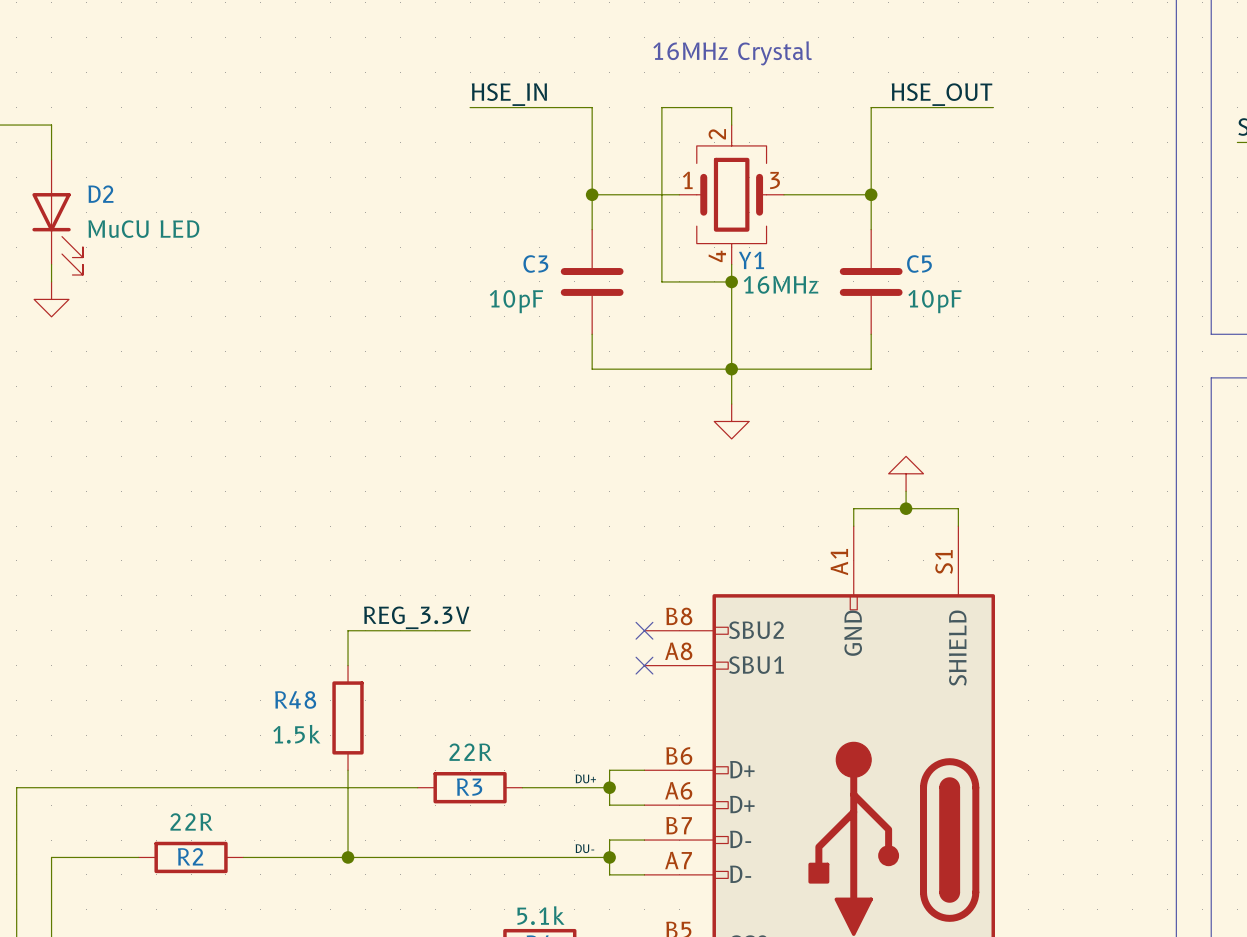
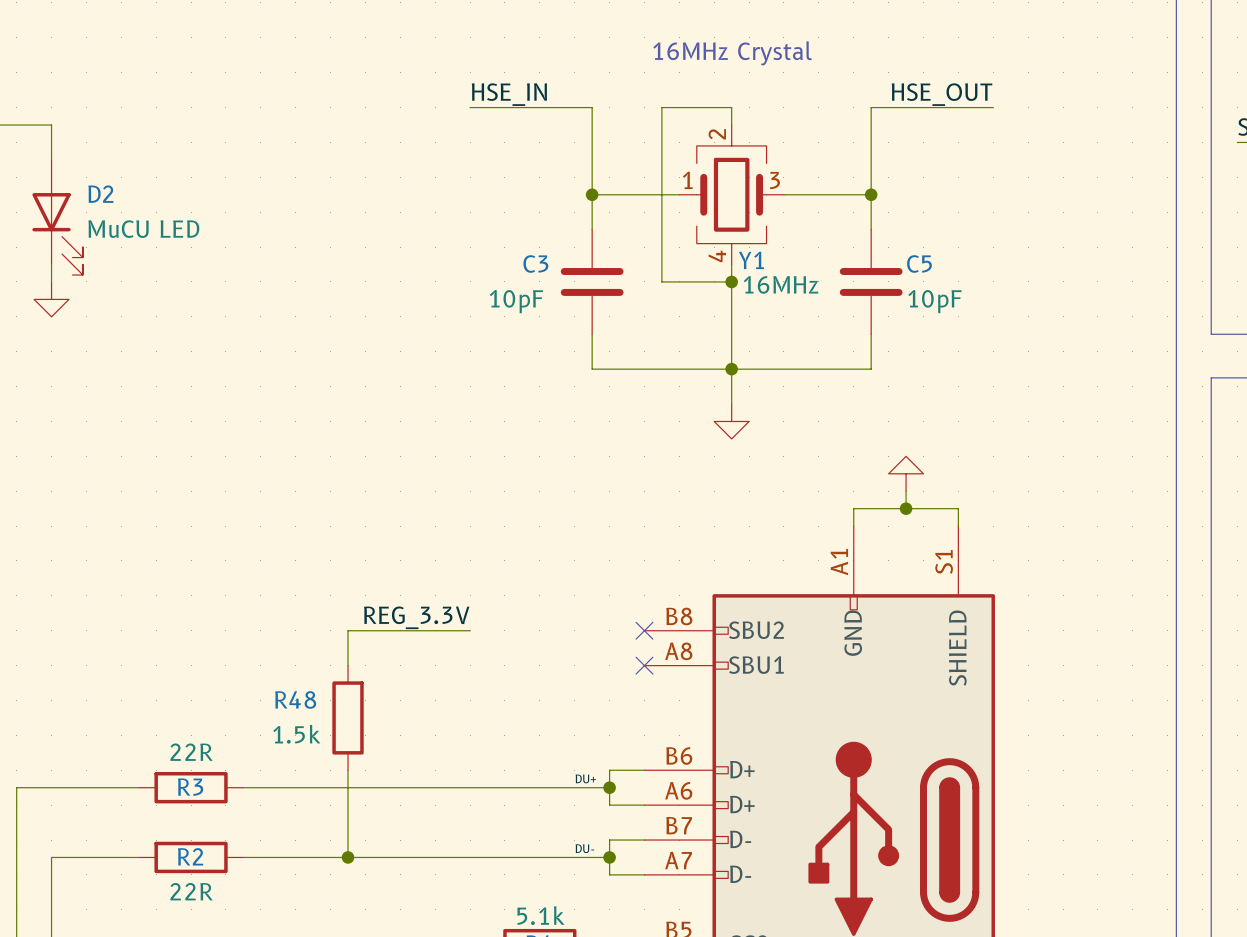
wire: (138, 787) (243, 787) -> (417, 787) (522, 787)
R3 position: (470, 787) -> (191, 787)
R2 value position: 22R (191, 821) -> 22R (191, 891)

